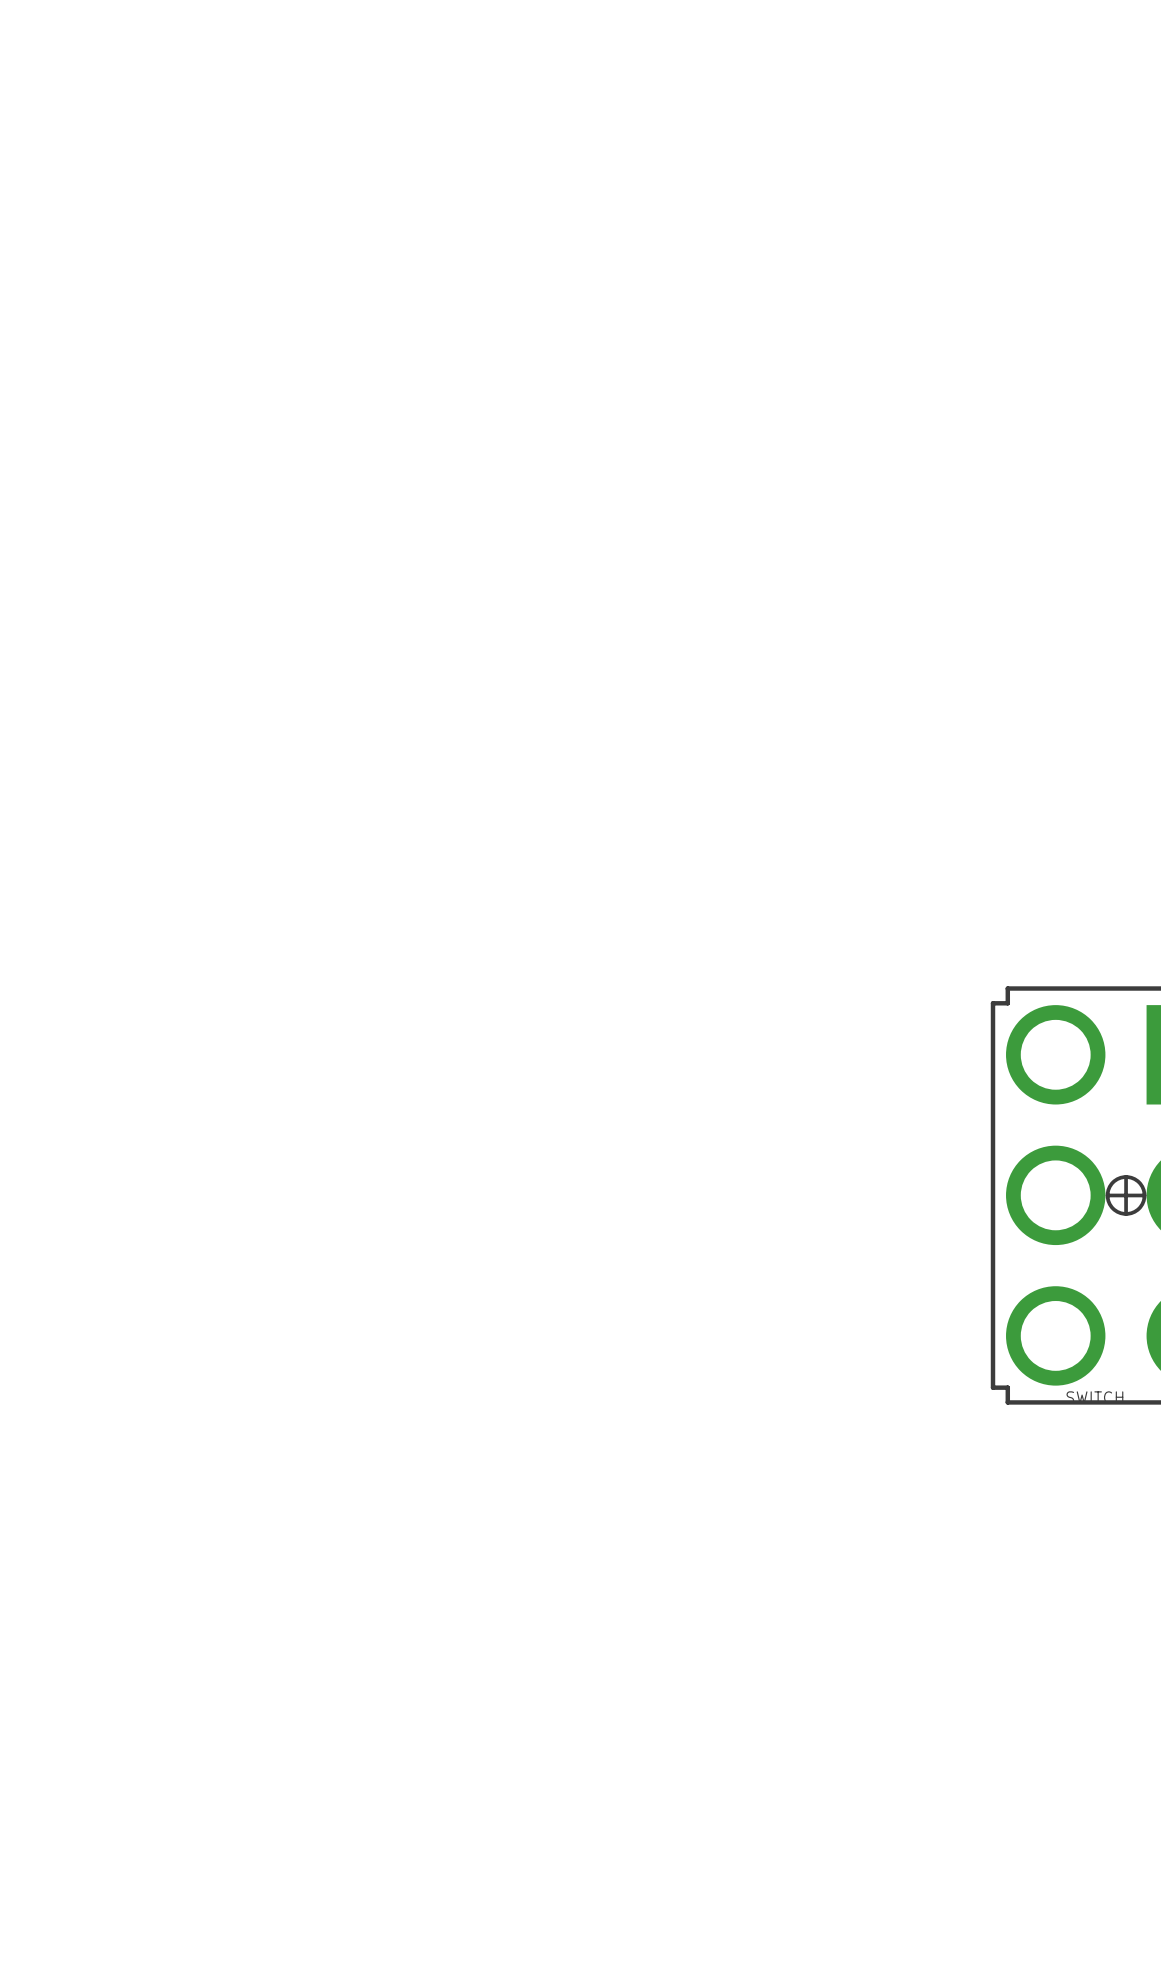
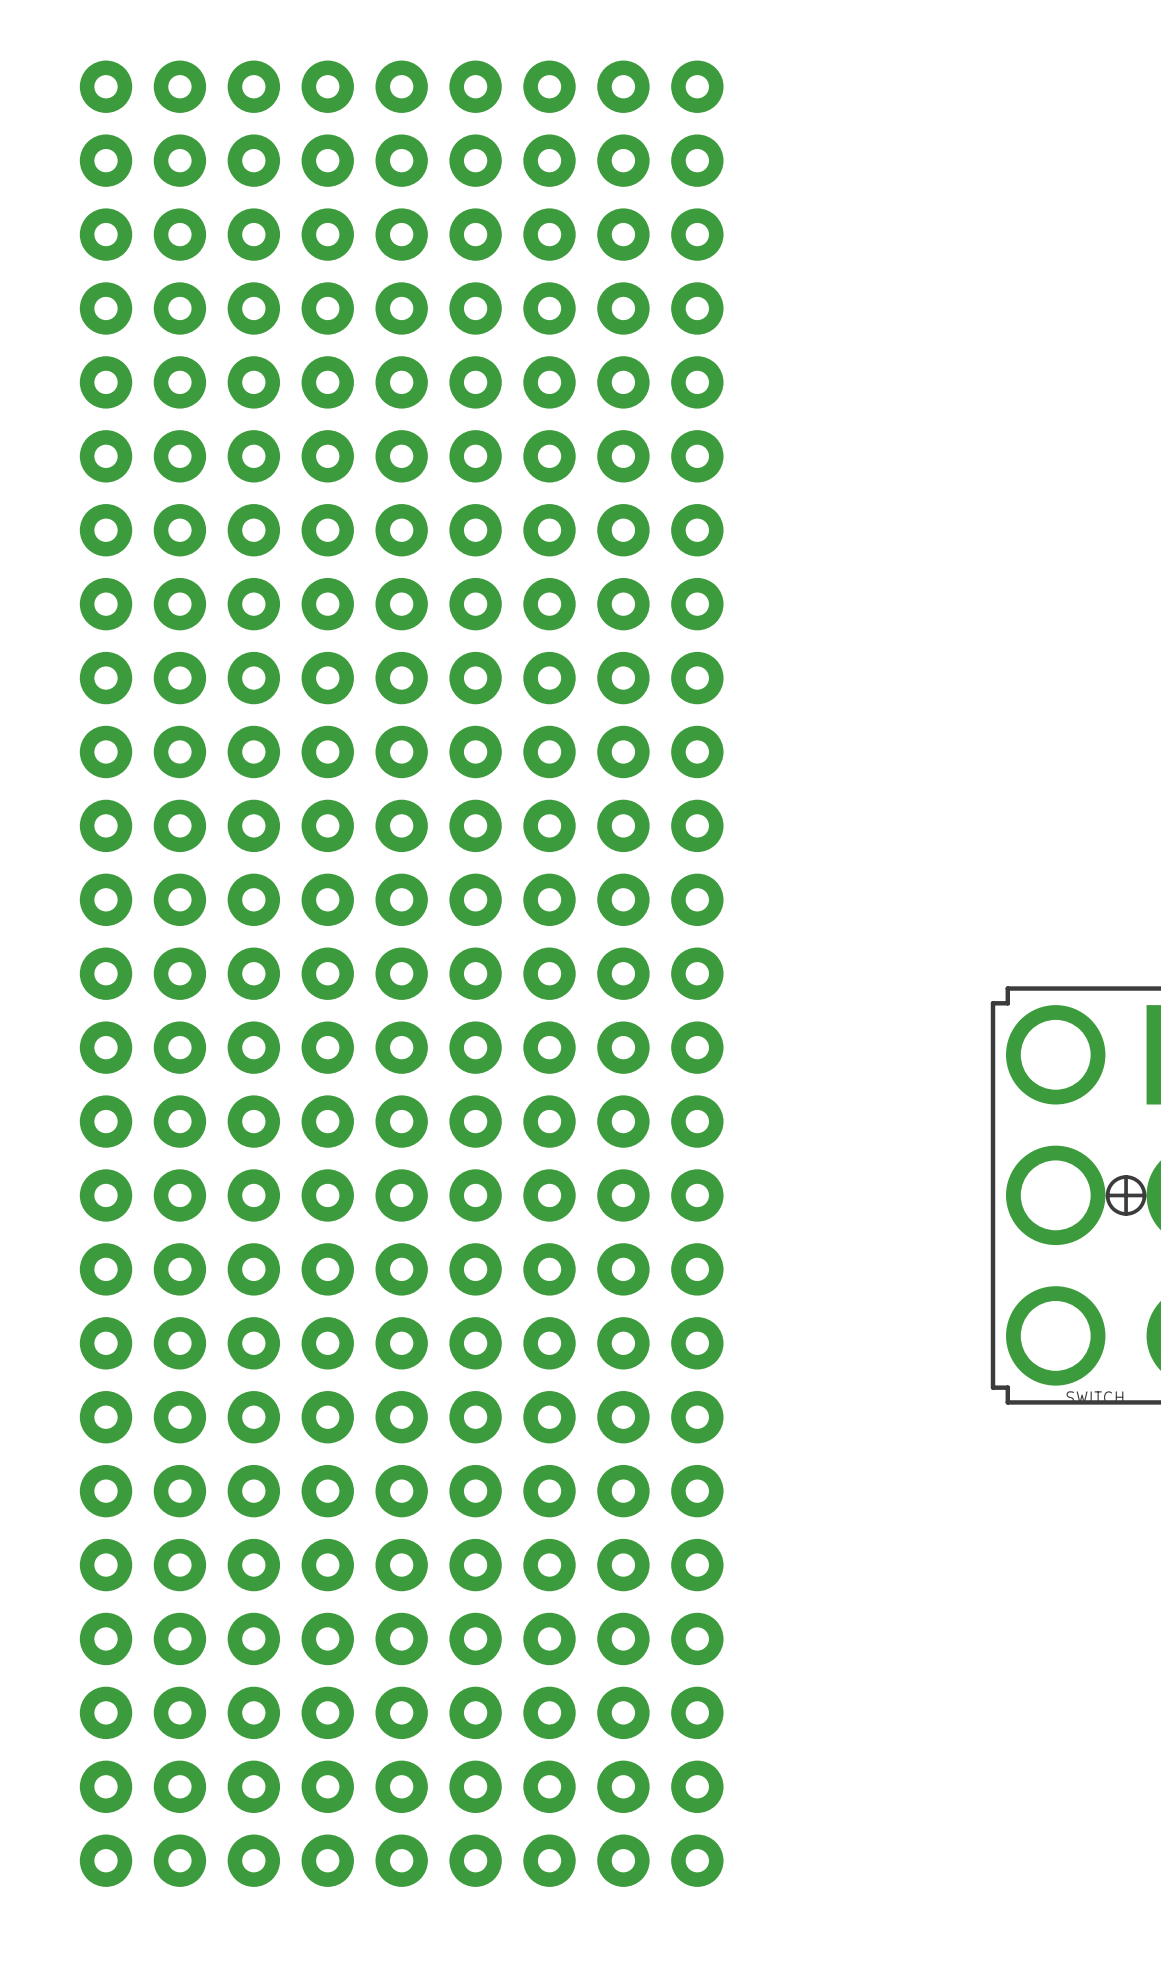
part: none -> (401, 973)

